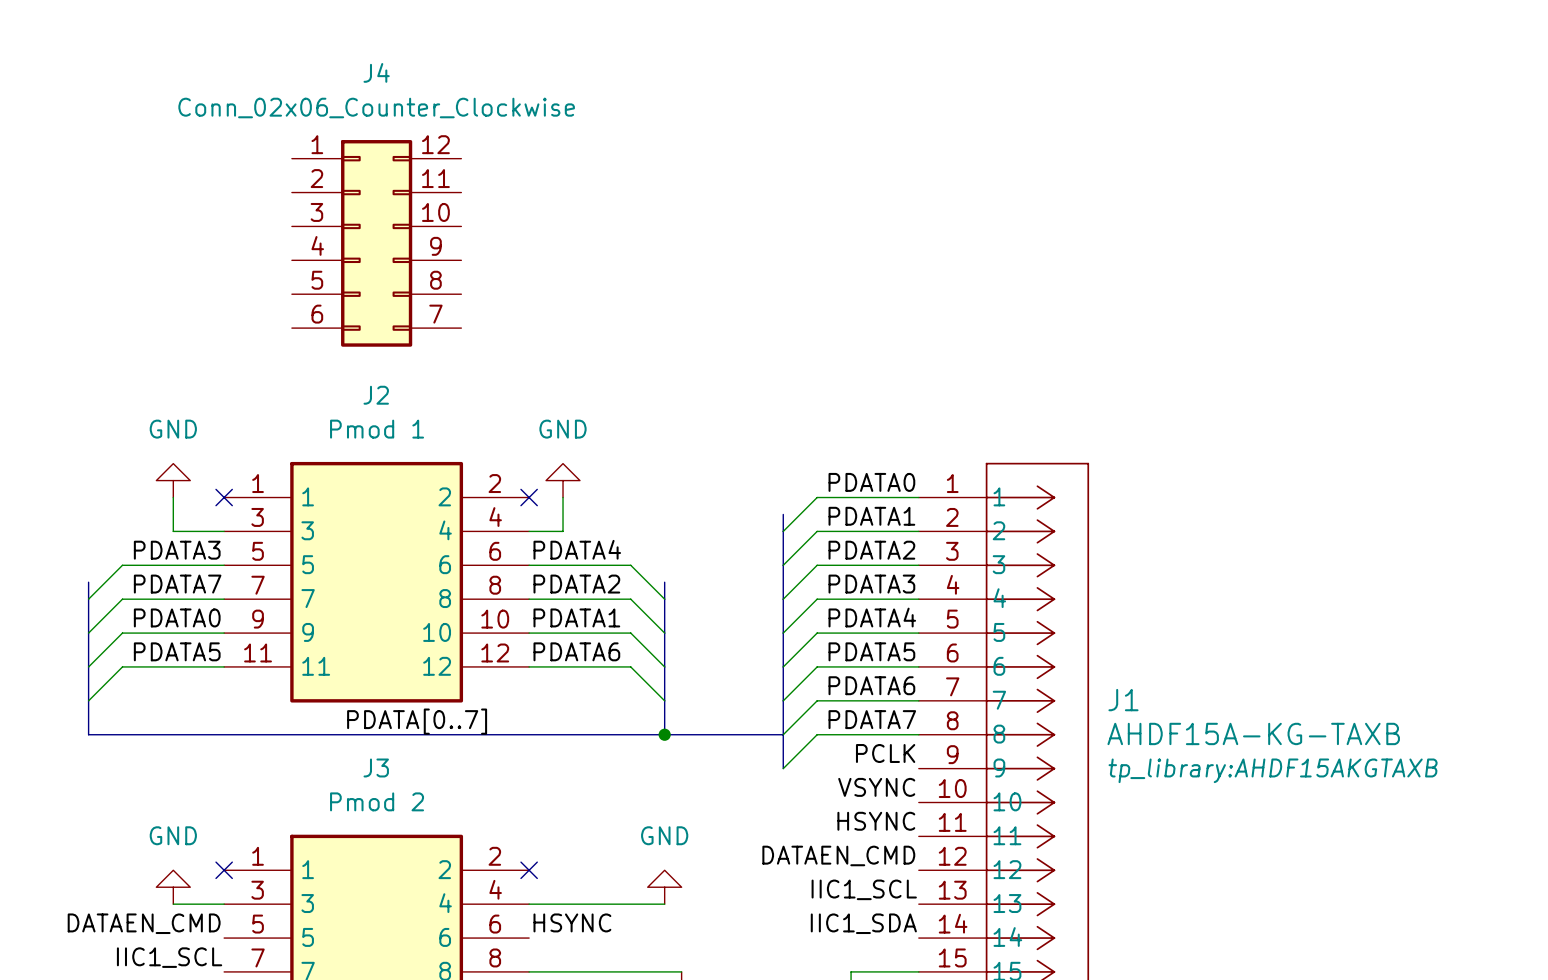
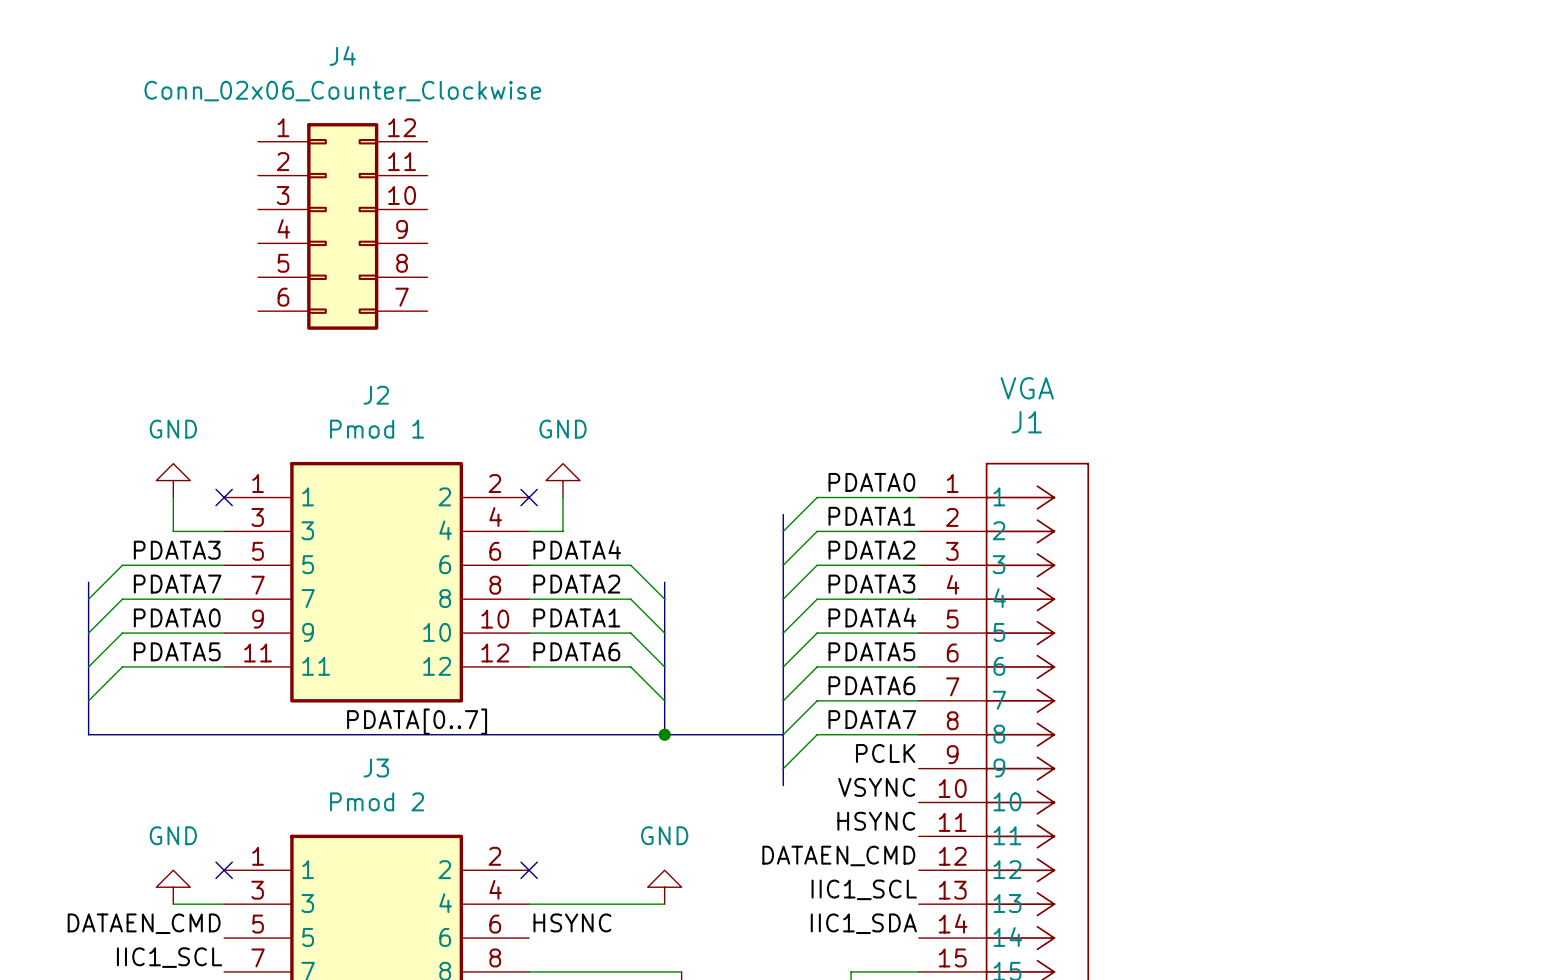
J4 position: (376, 243) -> (342, 226)
J1 name position: J1 (1123, 700) -> J1 (1026, 422)
J1 value: AHDF15A-KG-TAXB (1253, 733) -> VGA (1027, 388)
bus: none -> (783, 768) (783, 785)
J1 text: tp_library:AHDF15AKGTAXB (1273, 770) -> none

